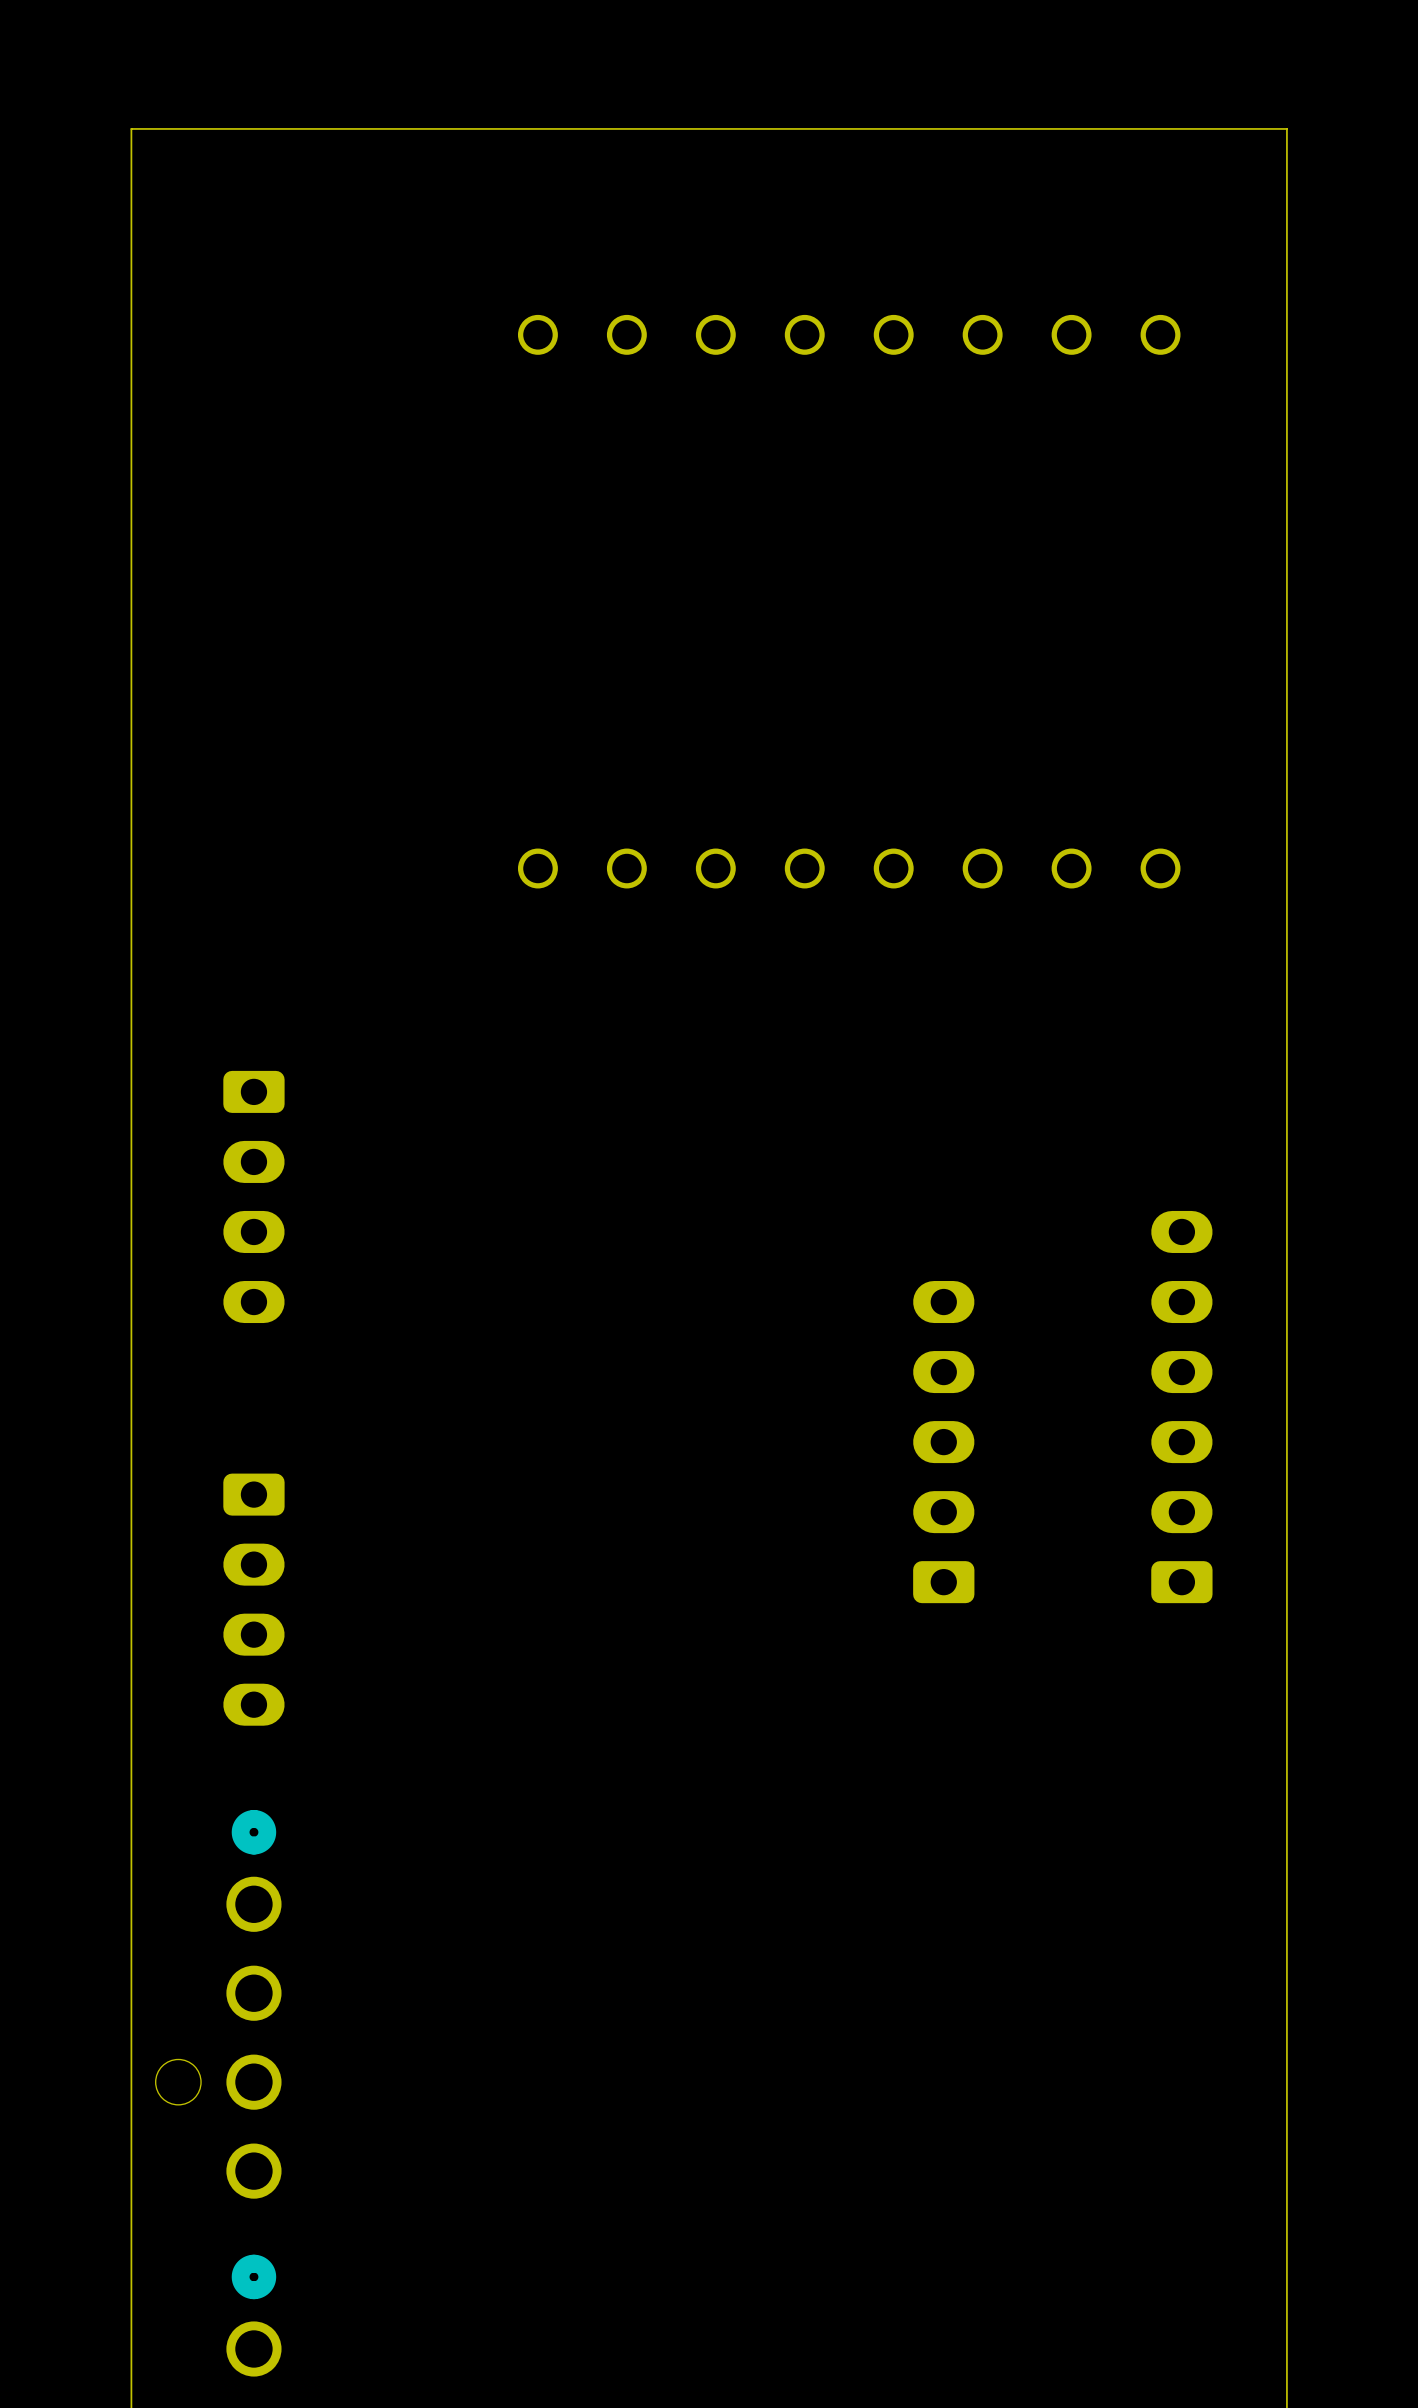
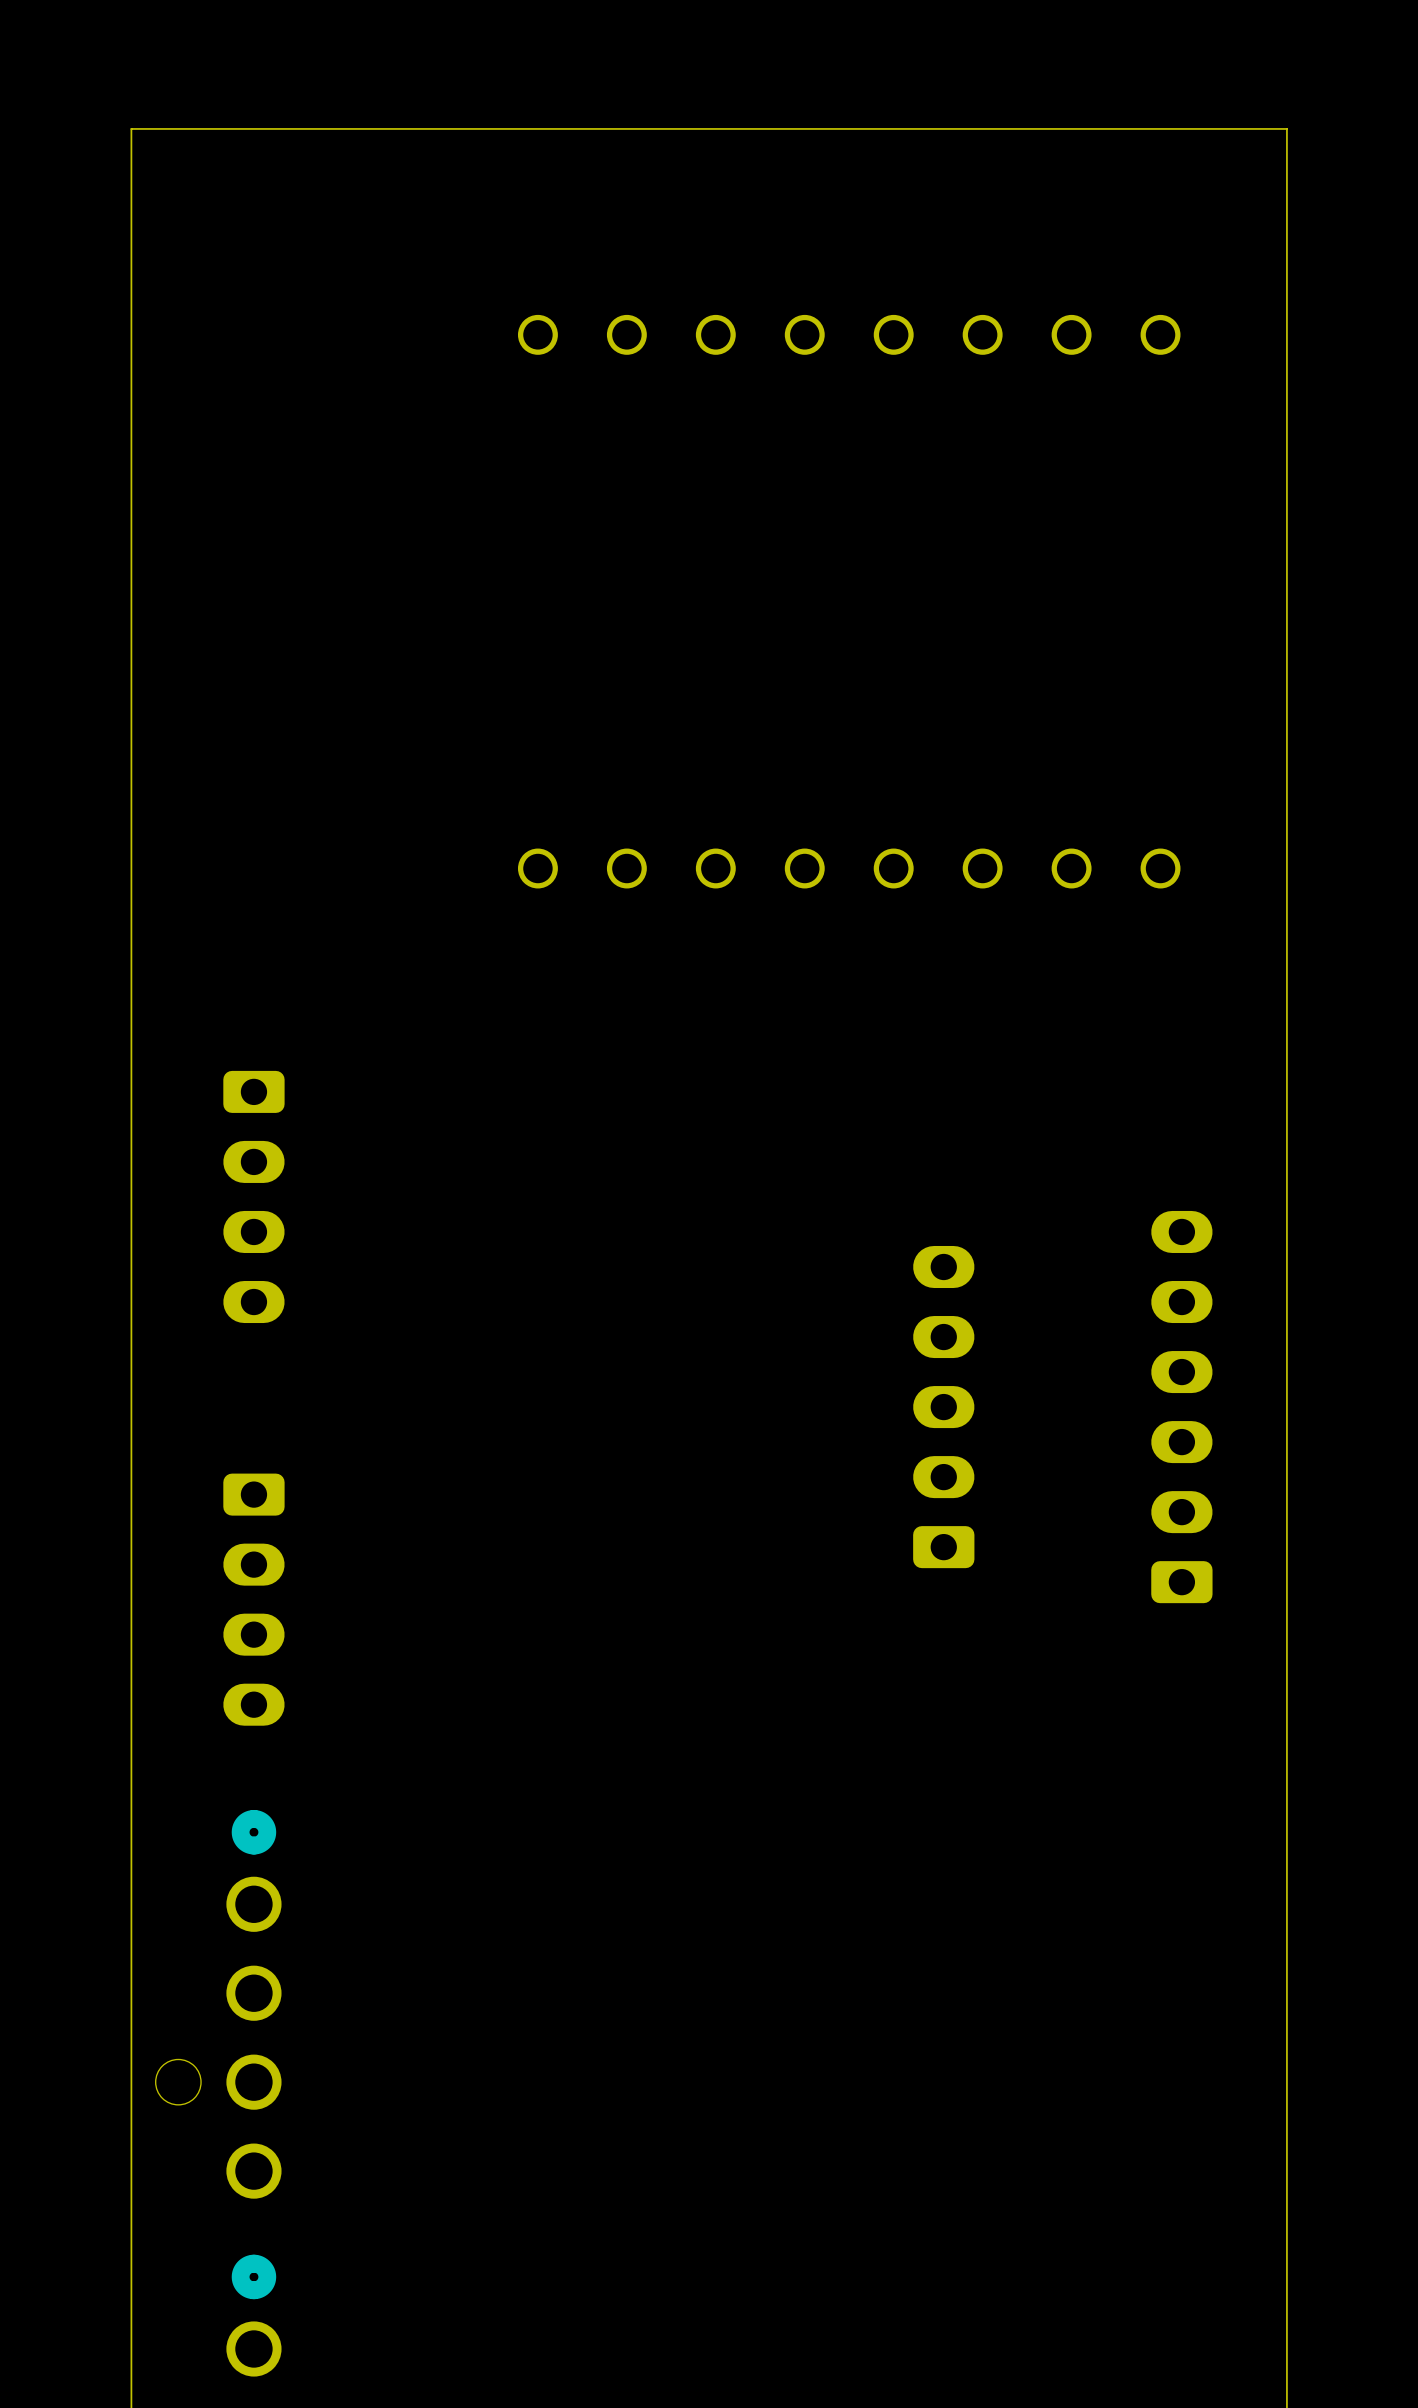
part position: (943, 1442) -> (943, 1407)

